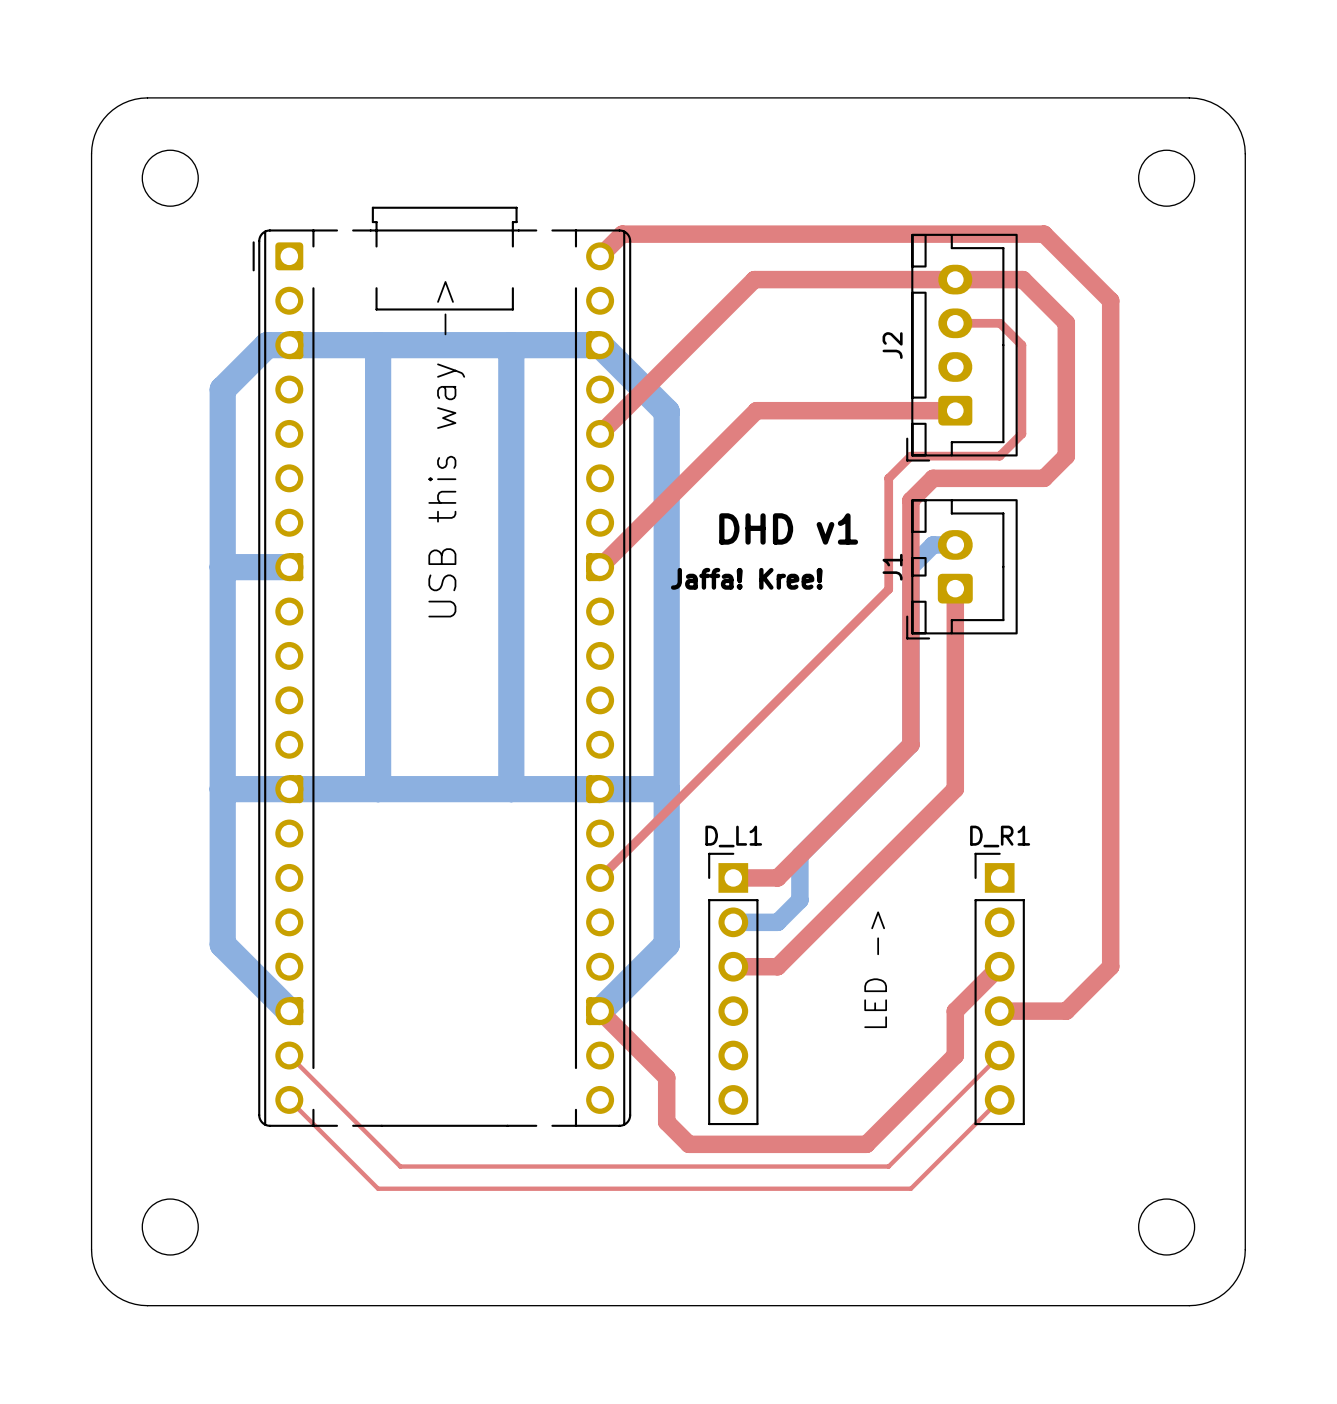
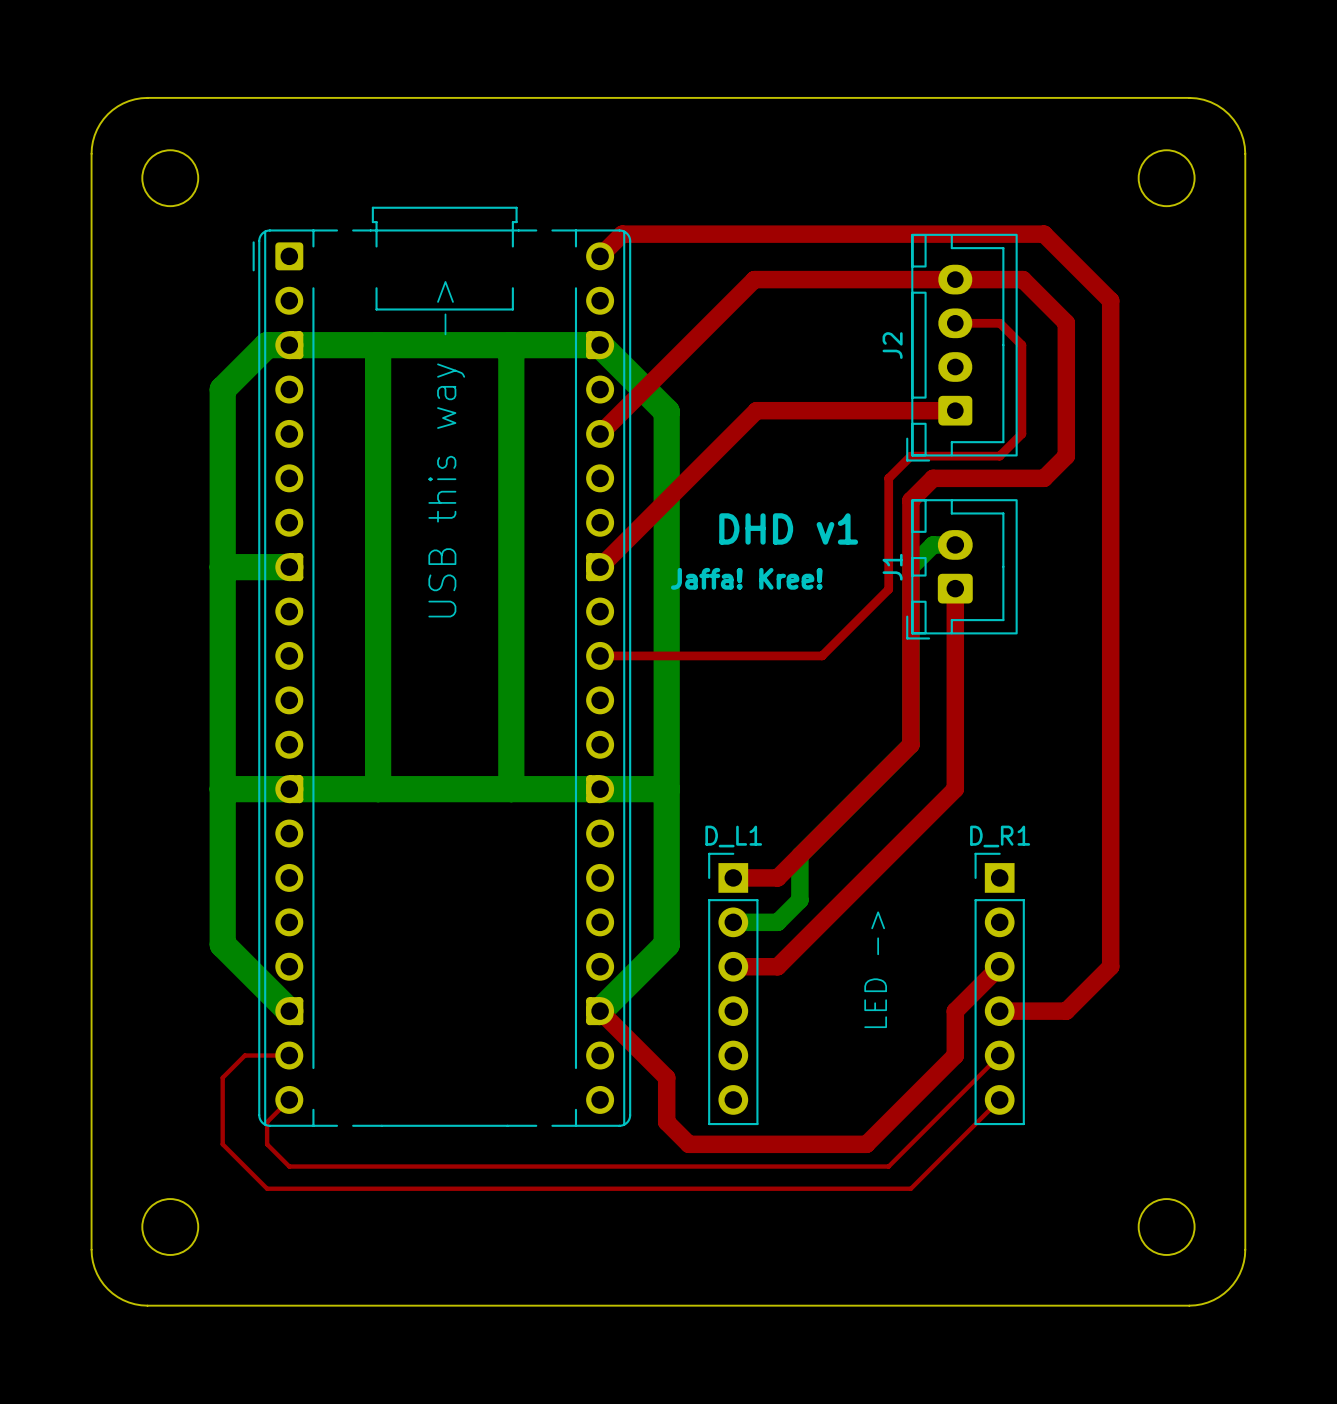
top track: (822, 655) (600, 877) -> (822, 655) (600, 655)
top track: (289, 1055) (400, 1166) -> (289, 1055) (244, 1055) (222, 1077) (222, 1144) (267, 1188) (378, 1188)
top track: (289, 1099) (378, 1188) -> (289, 1099) (267, 1122) (267, 1144) (289, 1166) (400, 1166)

